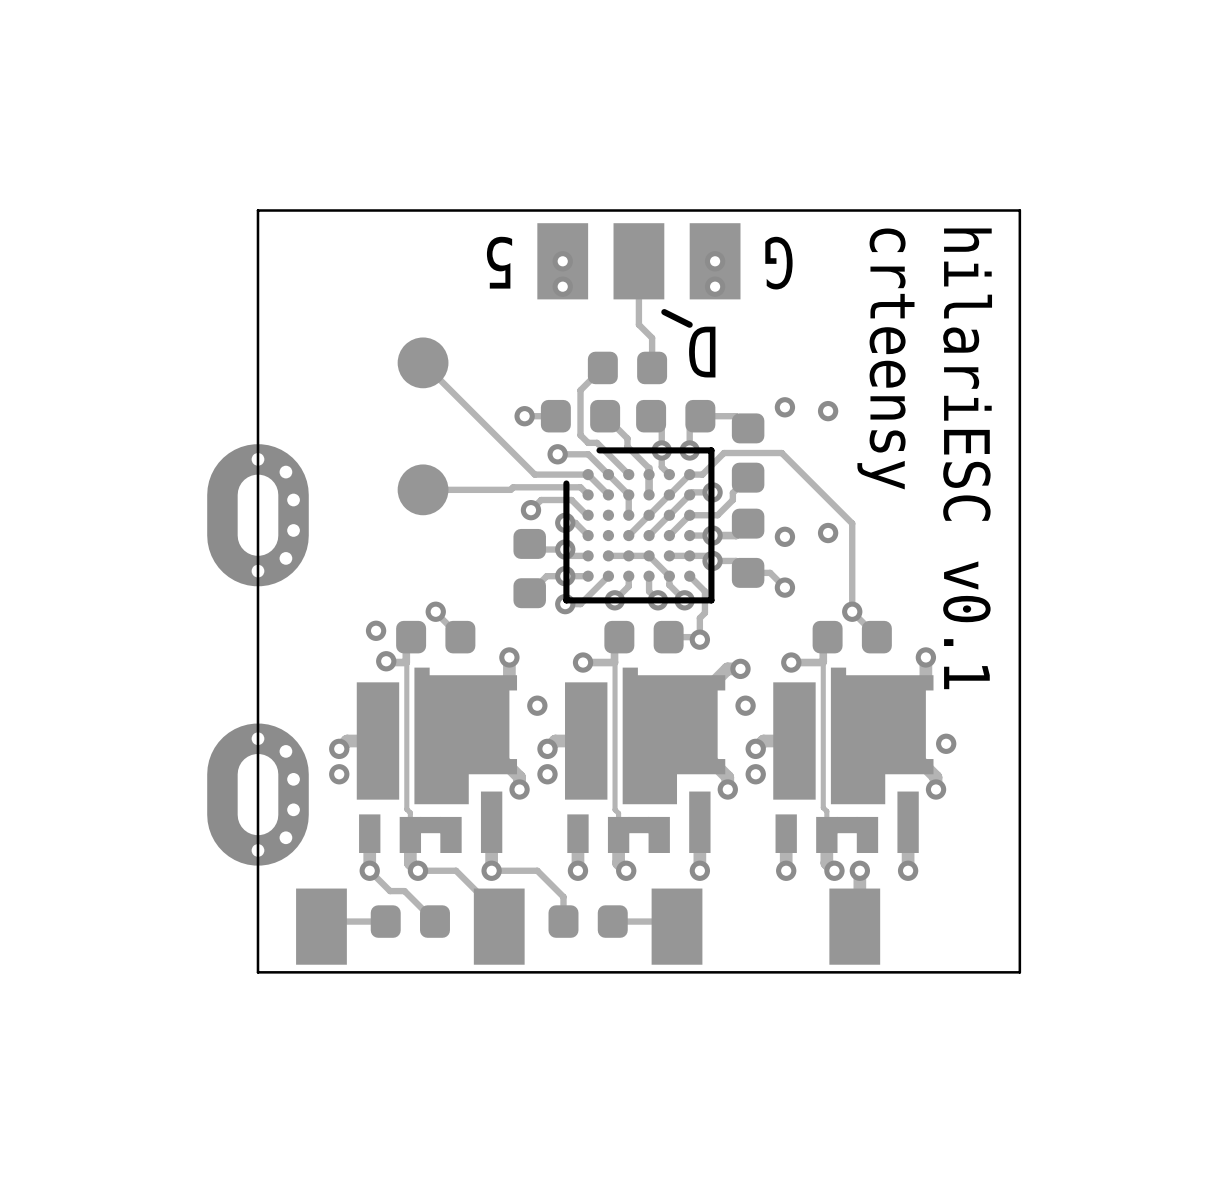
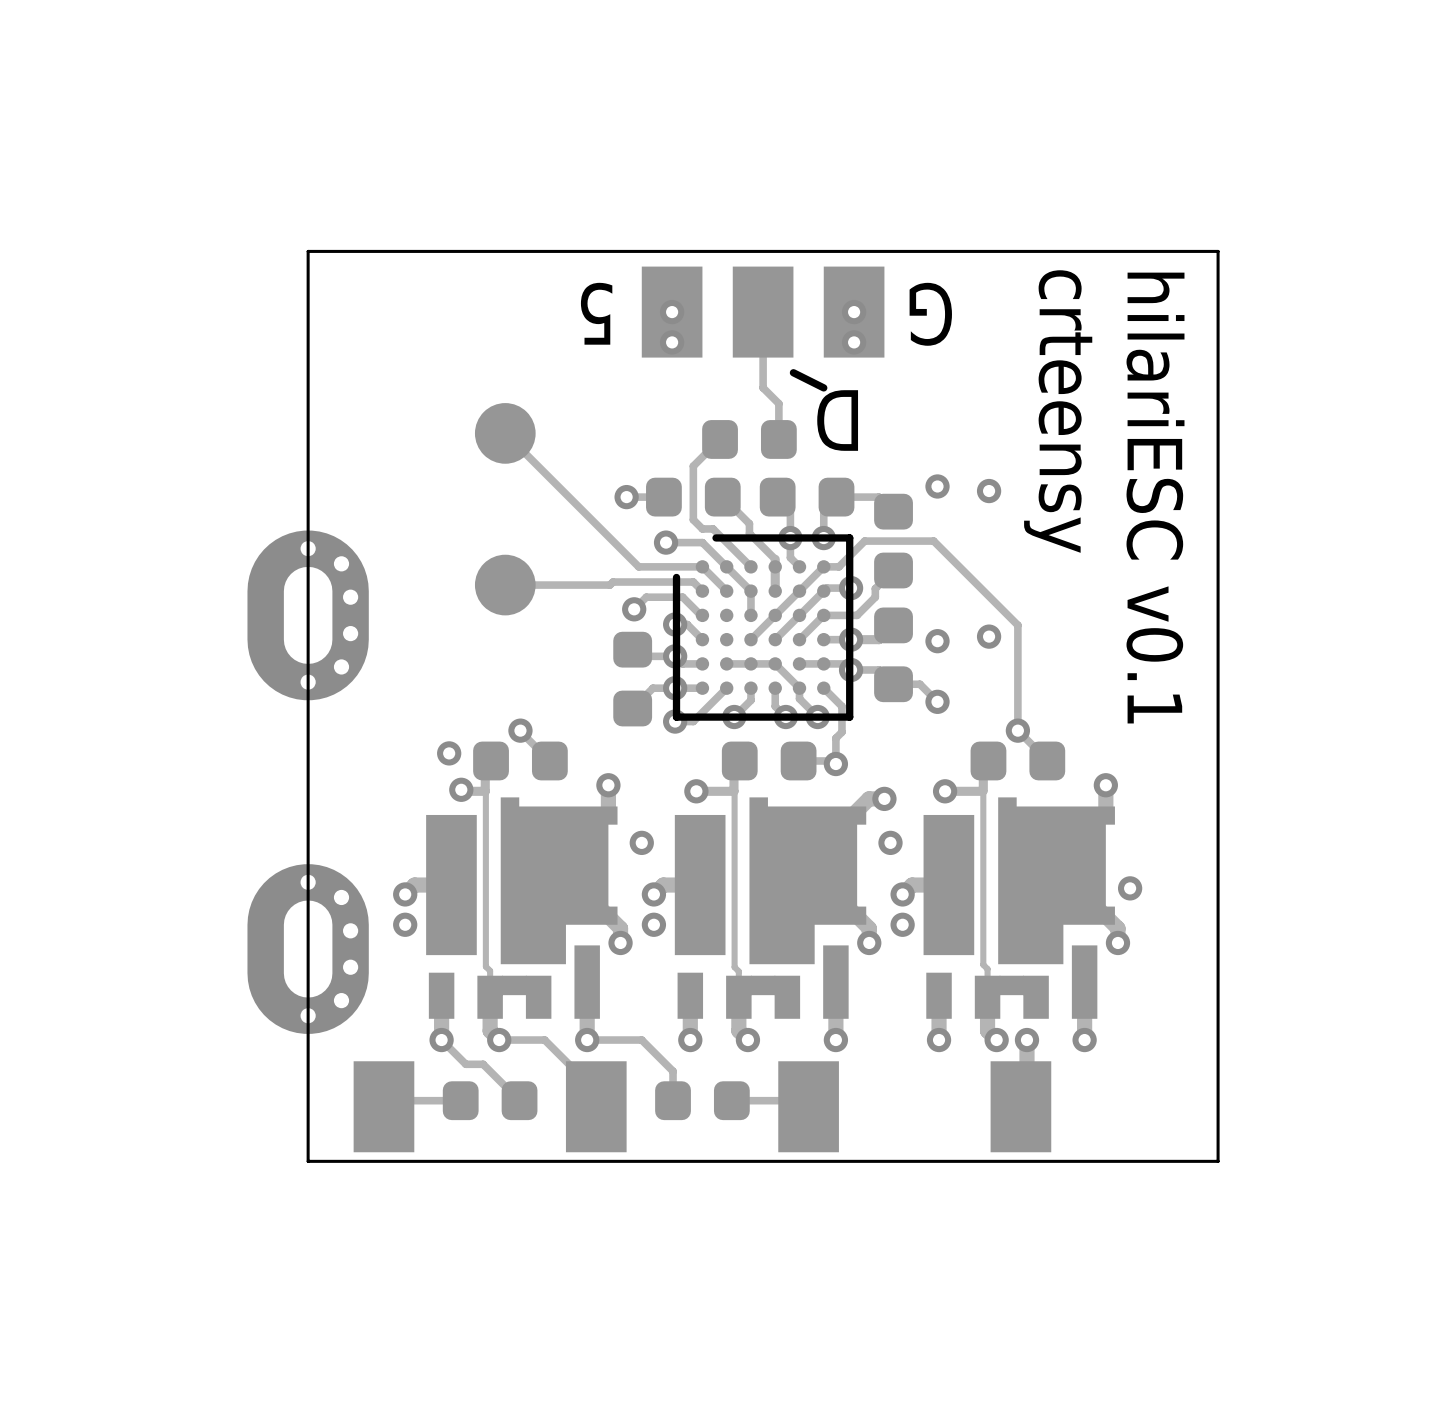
part footprint: [356, 667, 518, 853] -> [426, 797, 618, 1019]
part footprint: [565, 667, 726, 853] -> [674, 797, 867, 1019]
part footprint: [773, 667, 934, 853] -> [923, 797, 1115, 1019]

